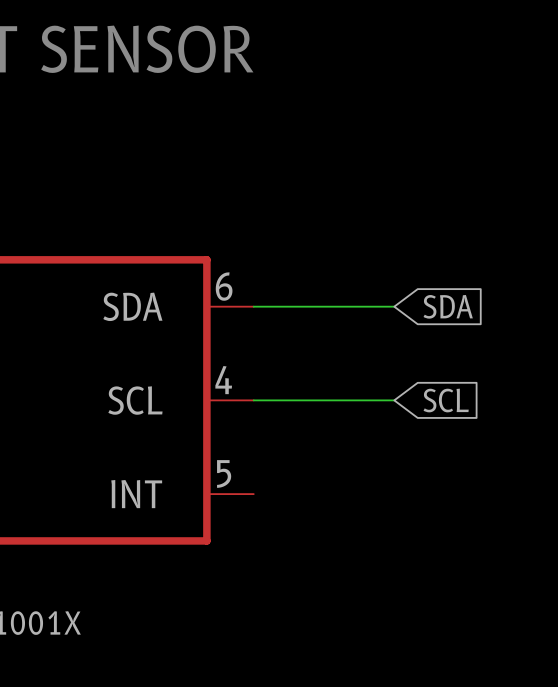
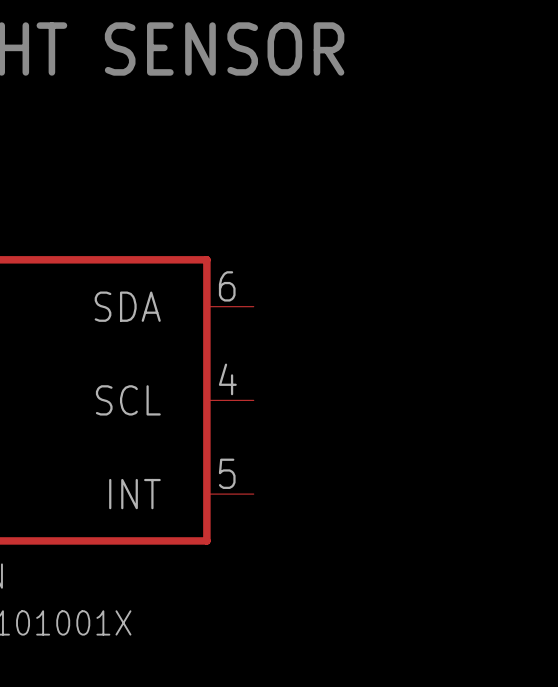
wire: (253, 306) (394, 306) -> none
global label: SDA (448, 306) -> none
wire: (253, 400) (394, 400) -> none
global label: SCL (446, 400) -> none

